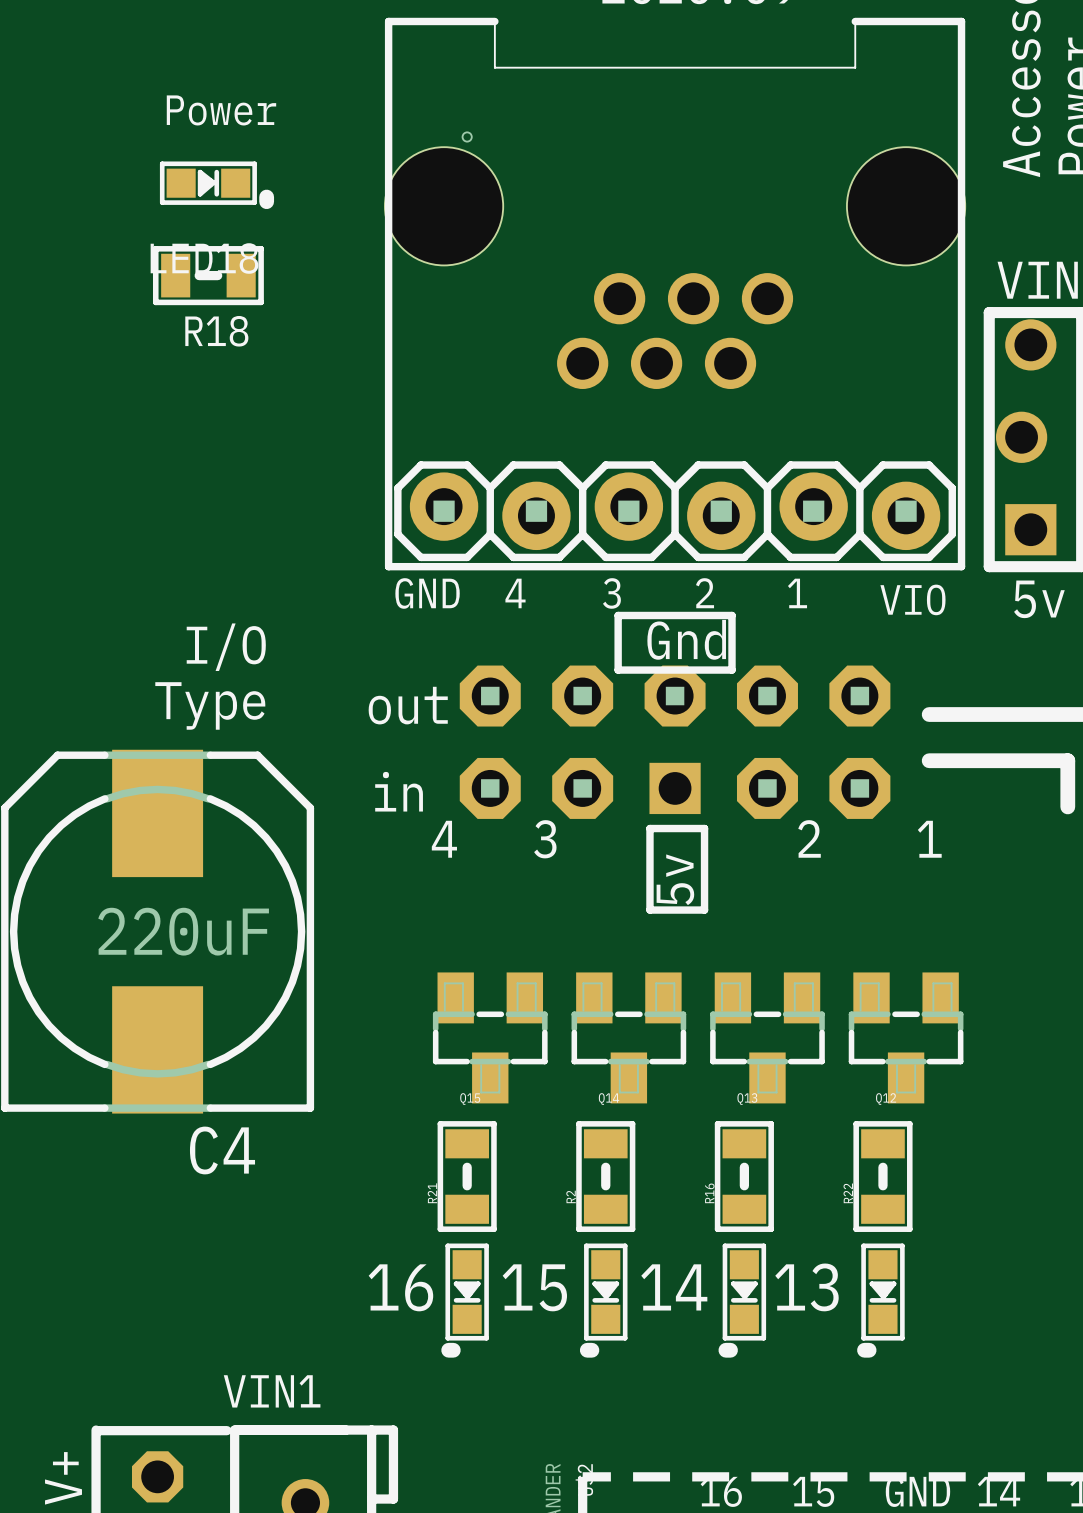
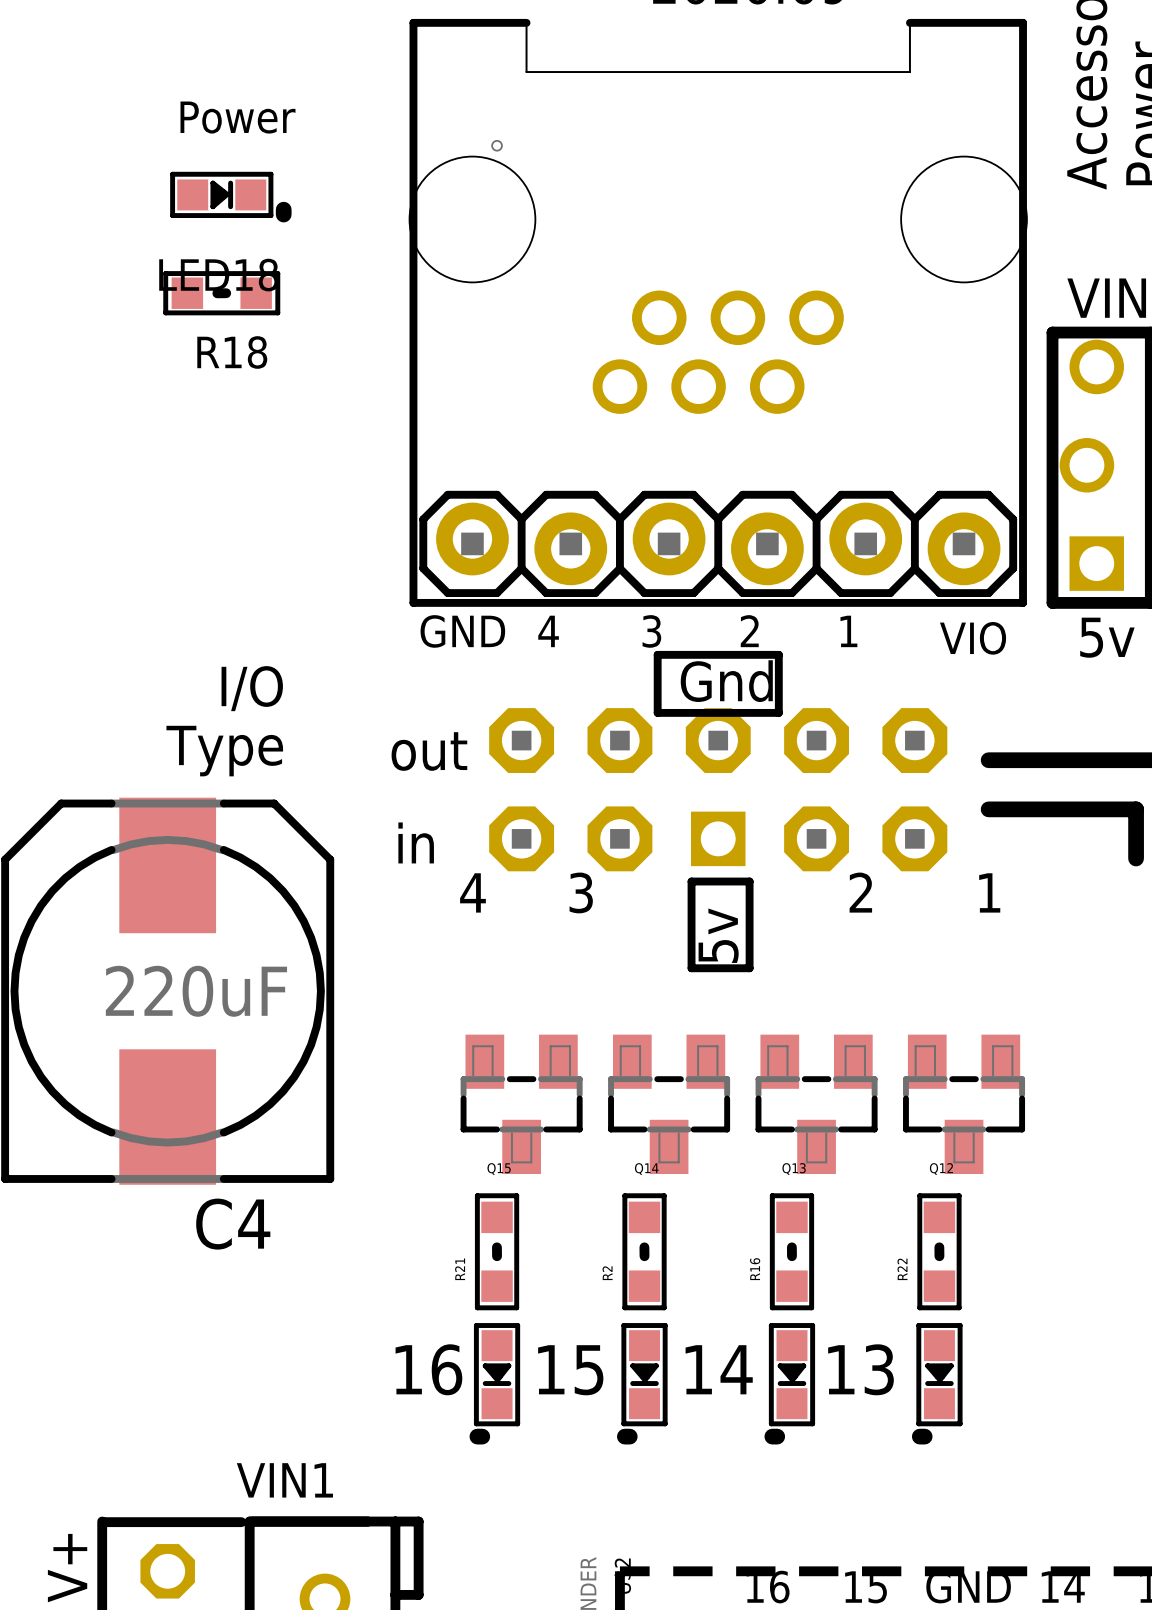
R18 footprint: [152, 246, 264, 306] -> [163, 271, 281, 316]
R21 footprint: [437, 1121, 497, 1232] -> [474, 1193, 520, 1311]
R2 footprint: [576, 1121, 636, 1232] -> [622, 1193, 667, 1311]
R16 footprint: [714, 1121, 774, 1232] -> [769, 1193, 815, 1311]
R22 footprint: [853, 1121, 913, 1232] -> [917, 1193, 962, 1311]

